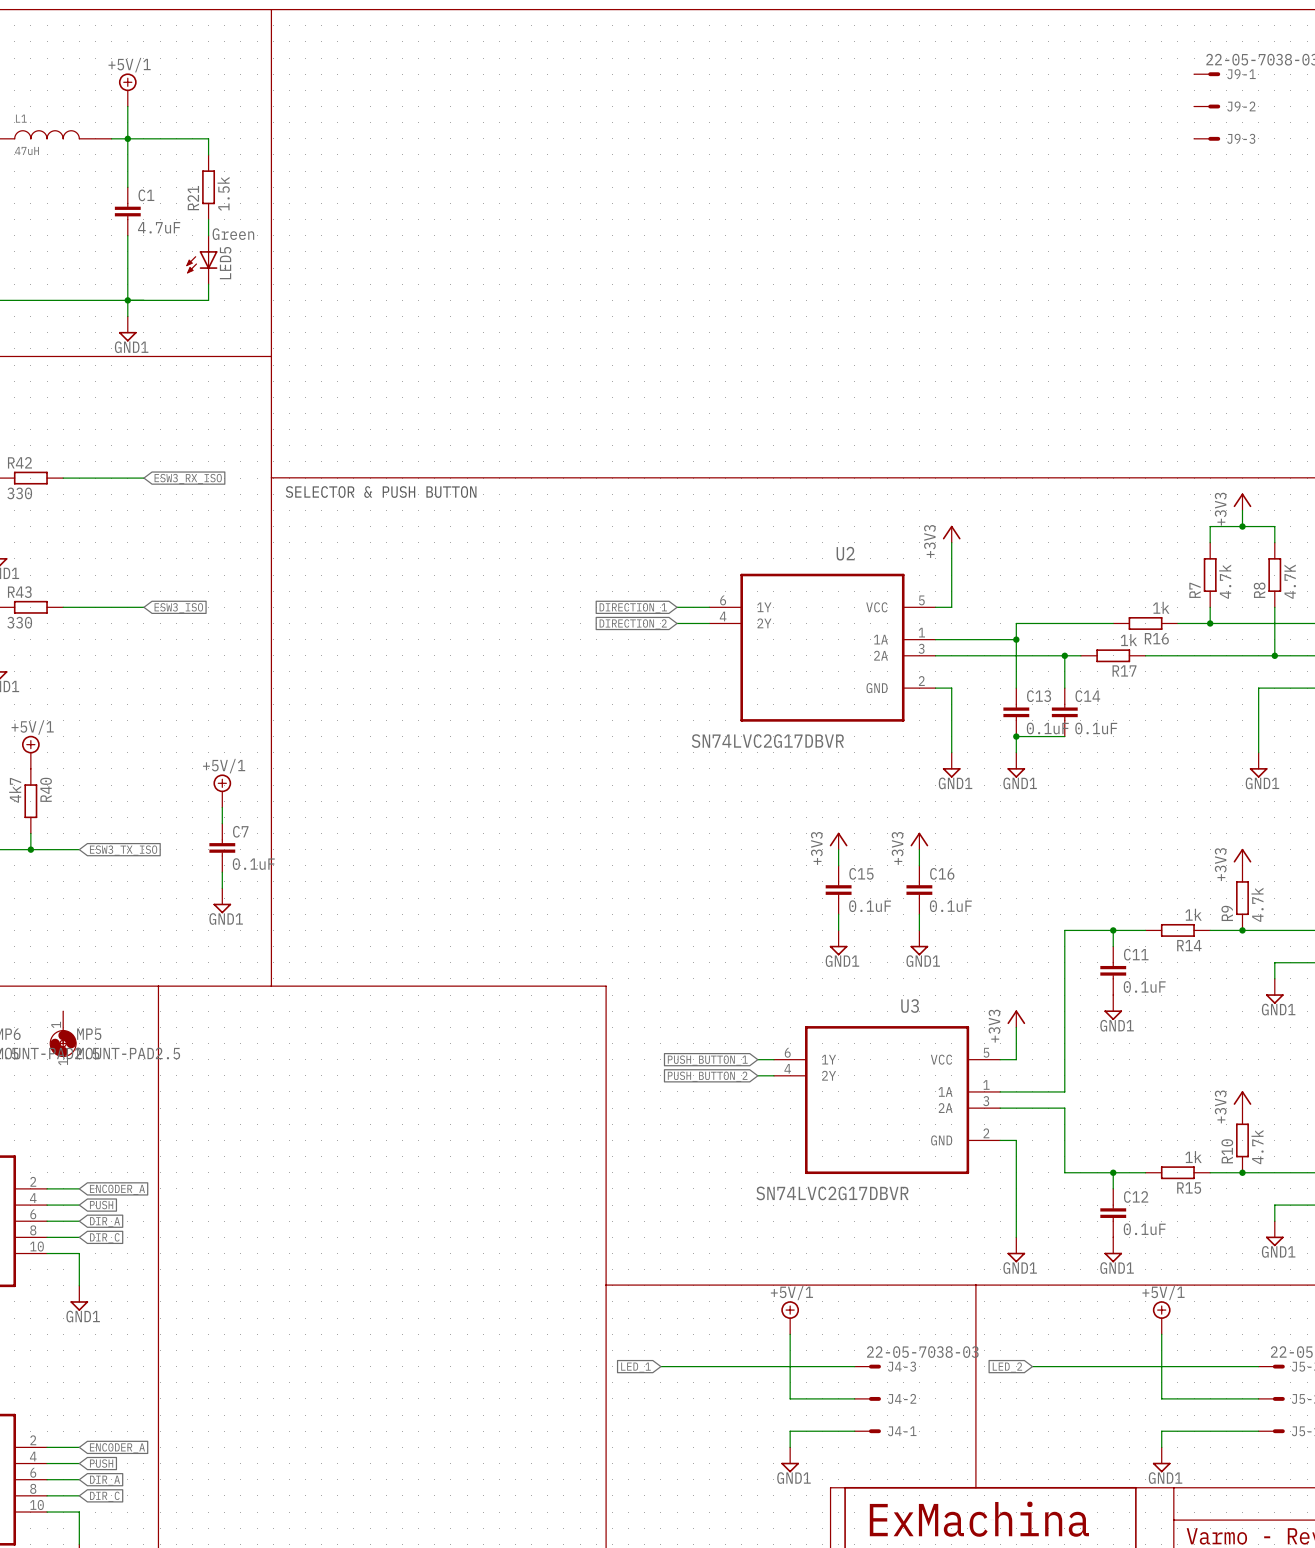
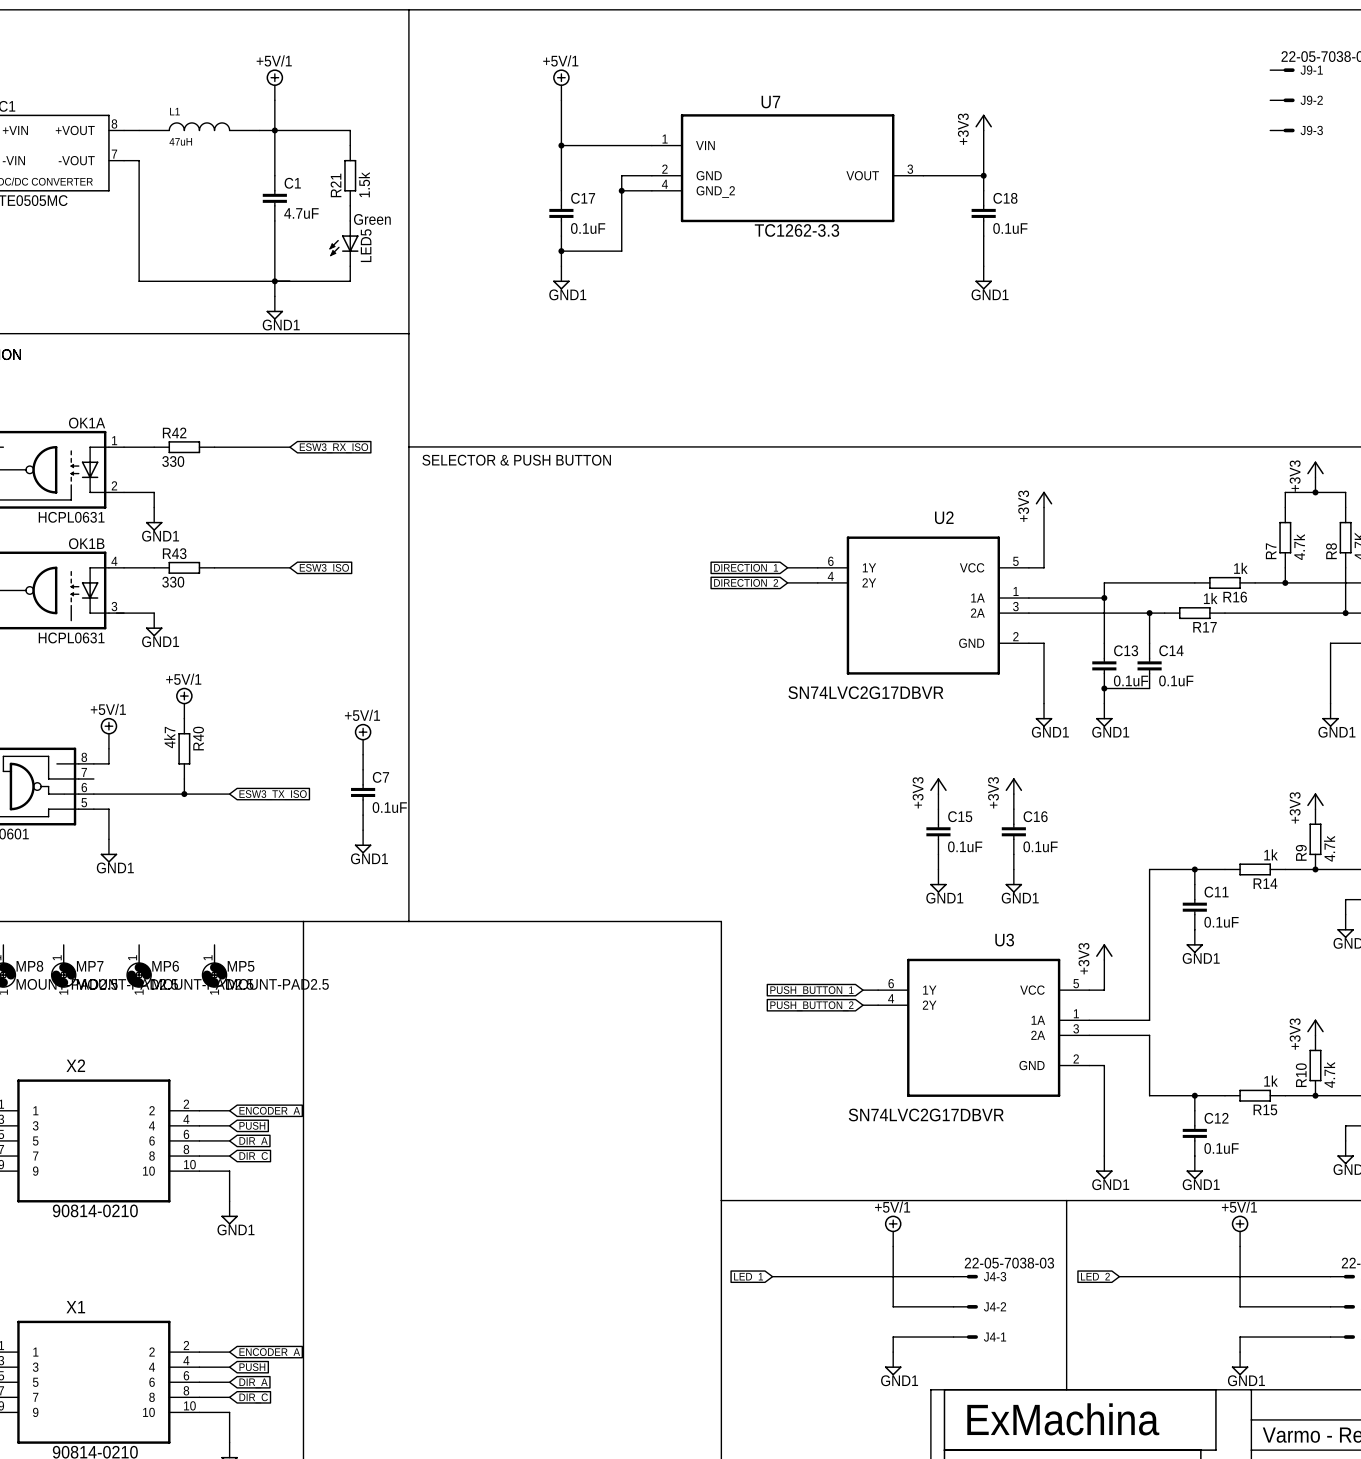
power symbol: none -> +5V/1 (561, 84)
wire: none -> (561, 100) (561, 190)
power symbol: none -> +3V3 (983, 122)
wire: none -> (983, 130) (983, 190)
wire: none -> (561, 145) (651, 145)
junction: none -> (561, 145)
U7: none -> TC1262-3.3 (787, 168)
wire: none -> (651, 175) (621, 175) (621, 251) (561, 251)
wire: none -> (923, 175) (983, 175)
junction: none -> (983, 175)
wire: none -> (621, 190) (651, 190)
junction: none -> (621, 190)
C17: none -> 0.1uF (561, 213)
C18: none -> 0.1uF (983, 213)
wire: none -> (561, 236) (561, 266)
wire: none -> (983, 236) (983, 266)
junction: none -> (561, 251)
power symbol: none -> GND1 (561, 277)
power symbol: none -> GND1 (983, 277)

